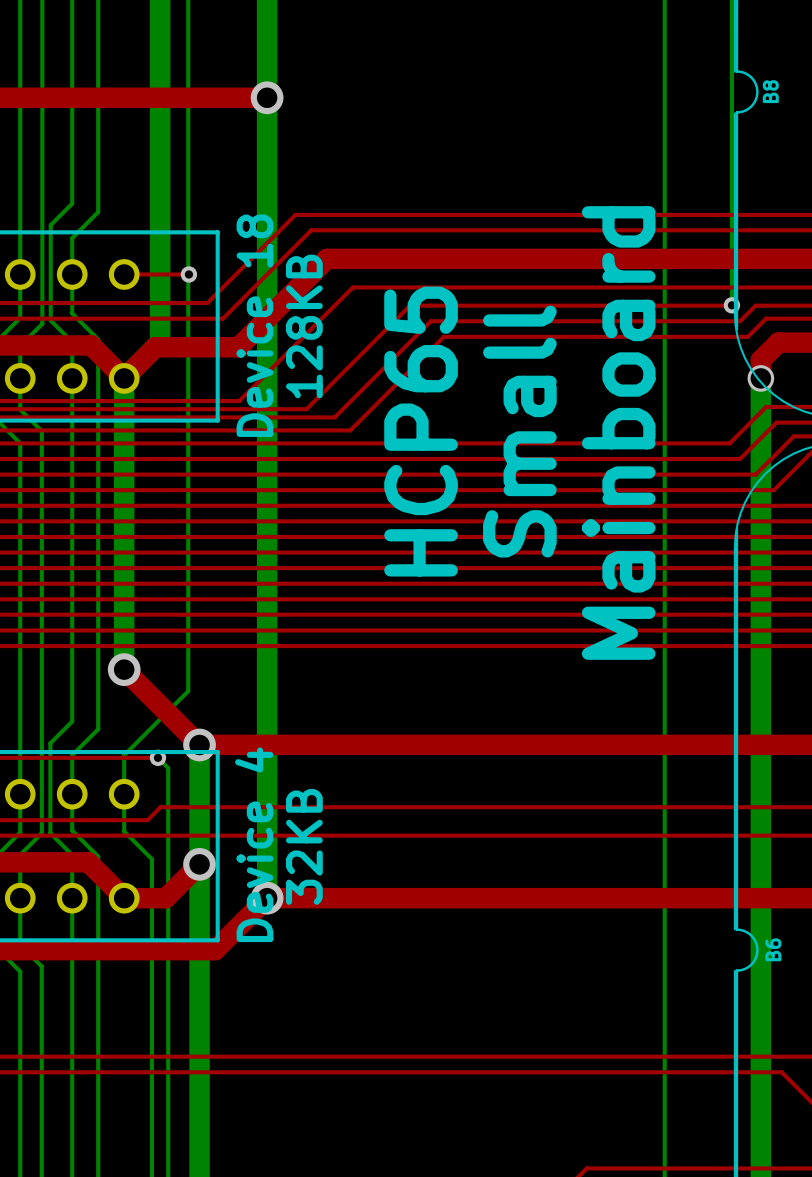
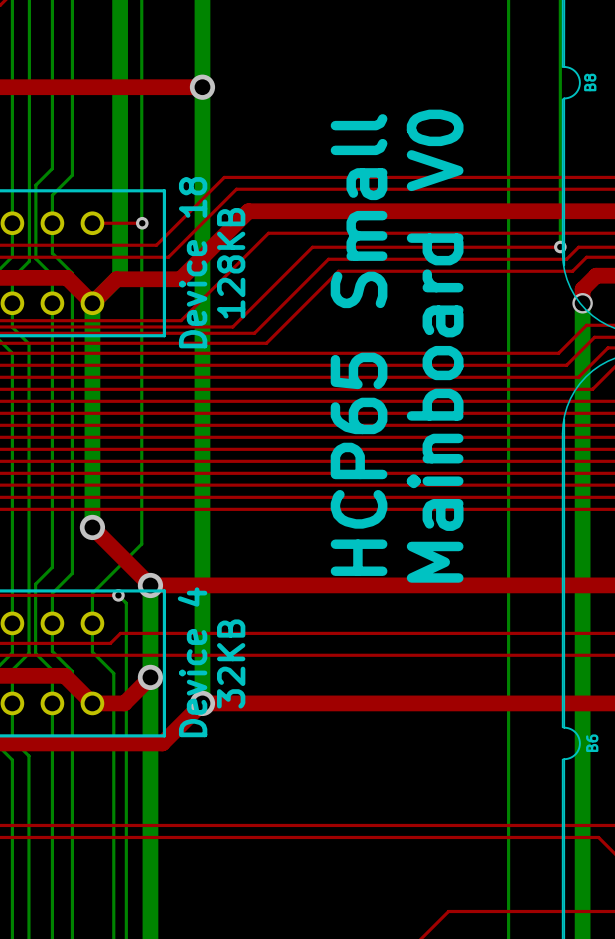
text: HCP65 (421, 431) -> none
text: Small (519, 431) -> none
text: none -> HCP65 Small (359, 345)
text: Mainboard (618, 433) -> Mainboard V0 (435, 346)

